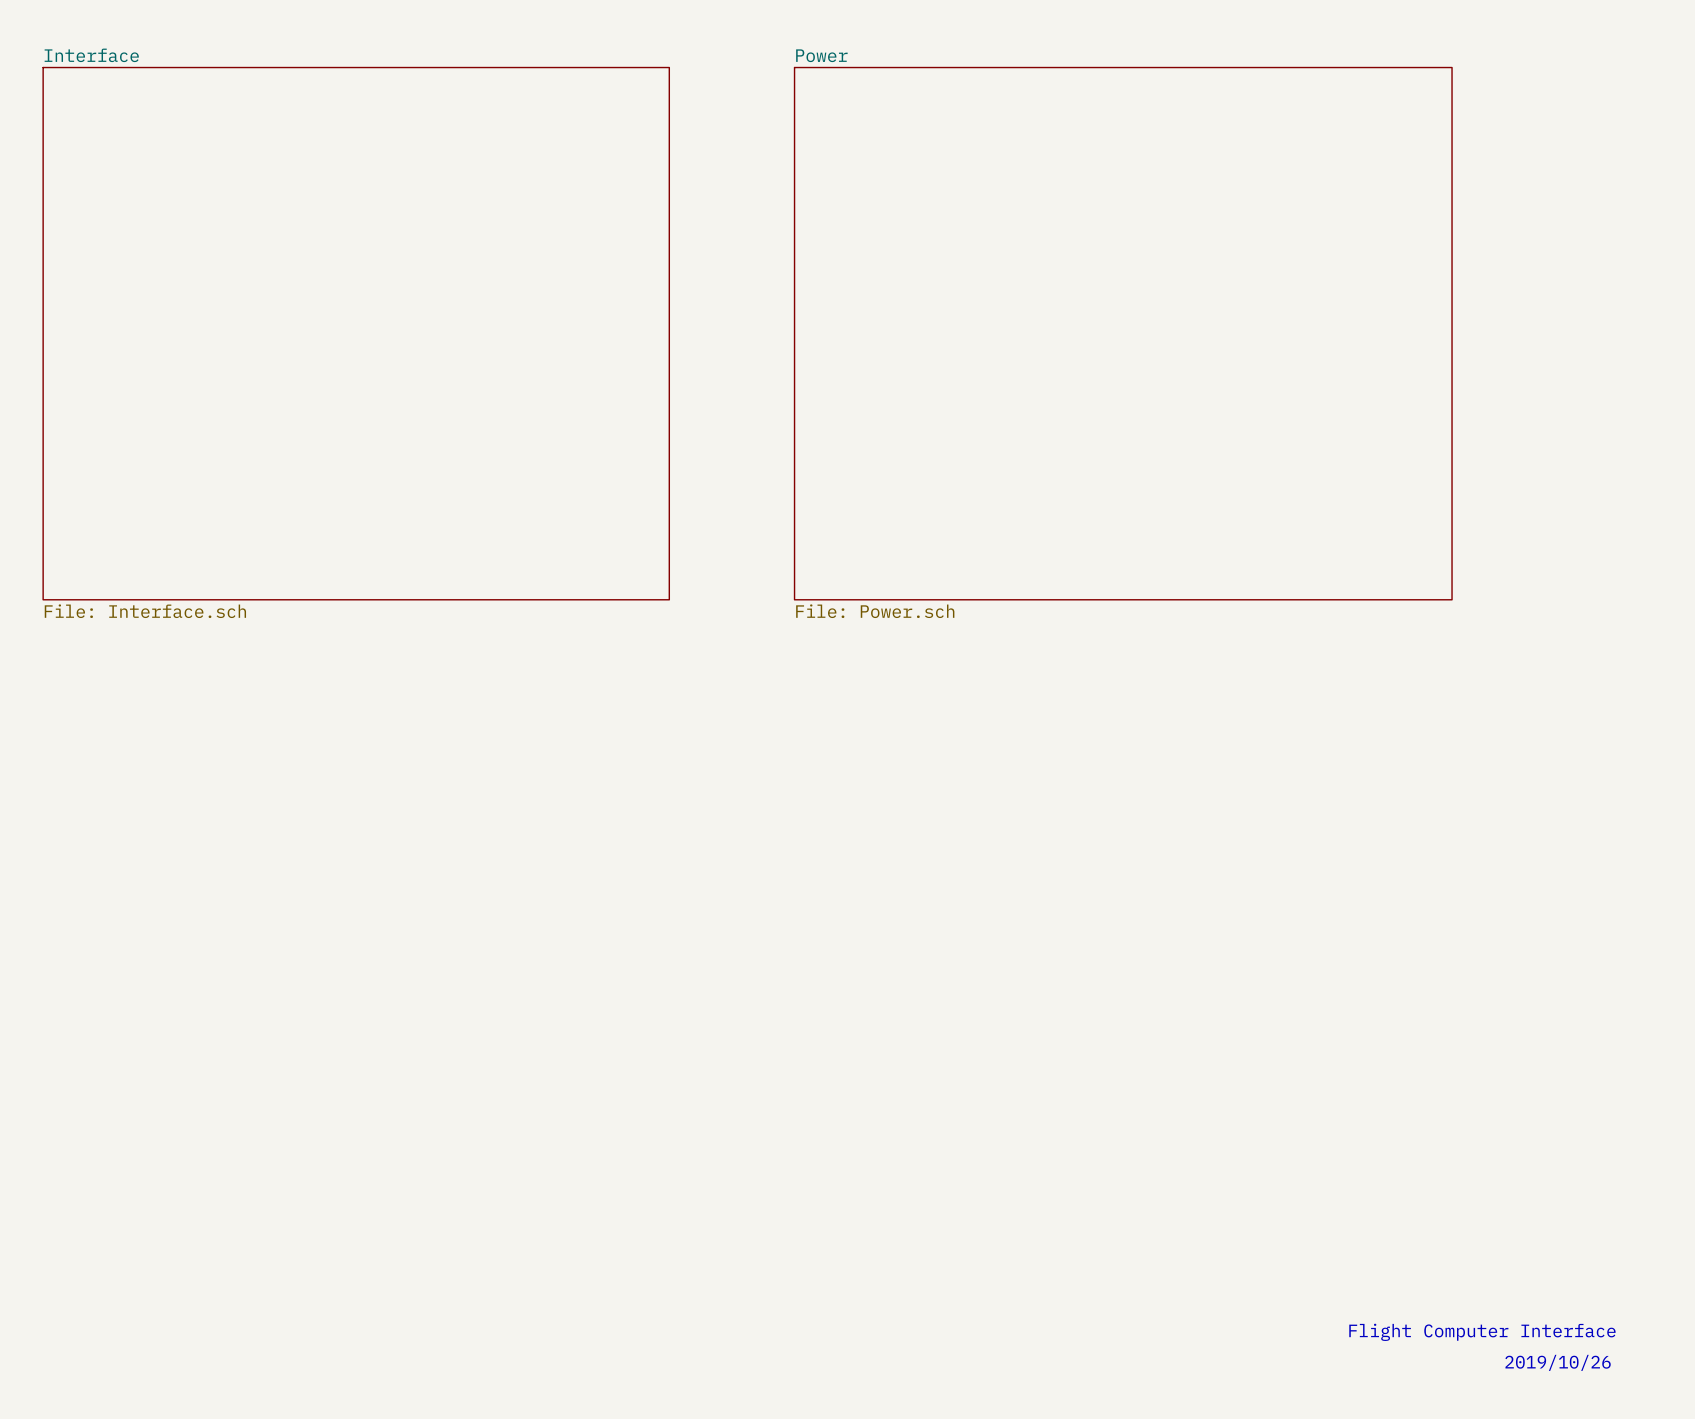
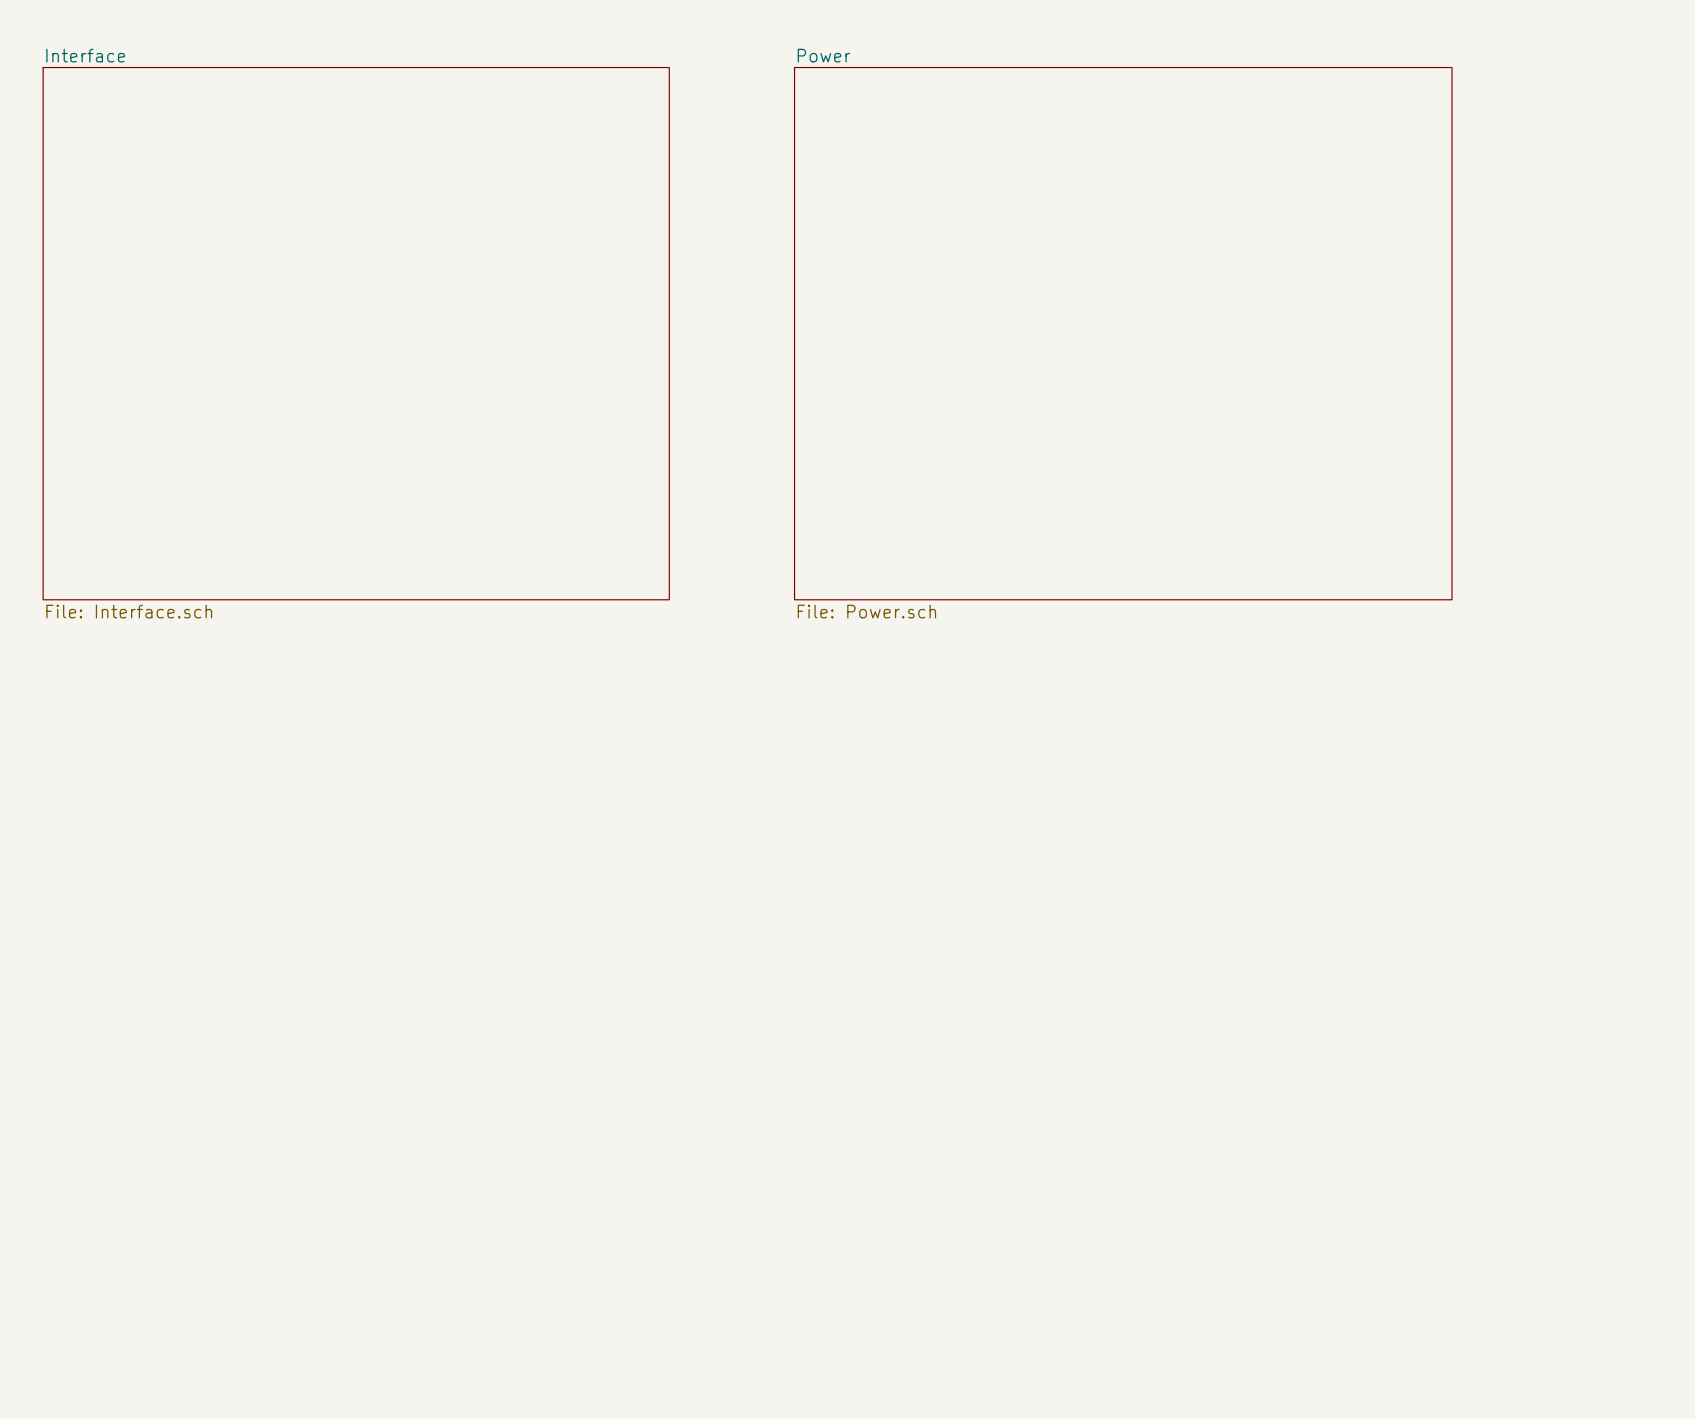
text: Flight Computer Interface (1482, 1332) -> none
text: 2019/10/26 (1558, 1362) -> none

